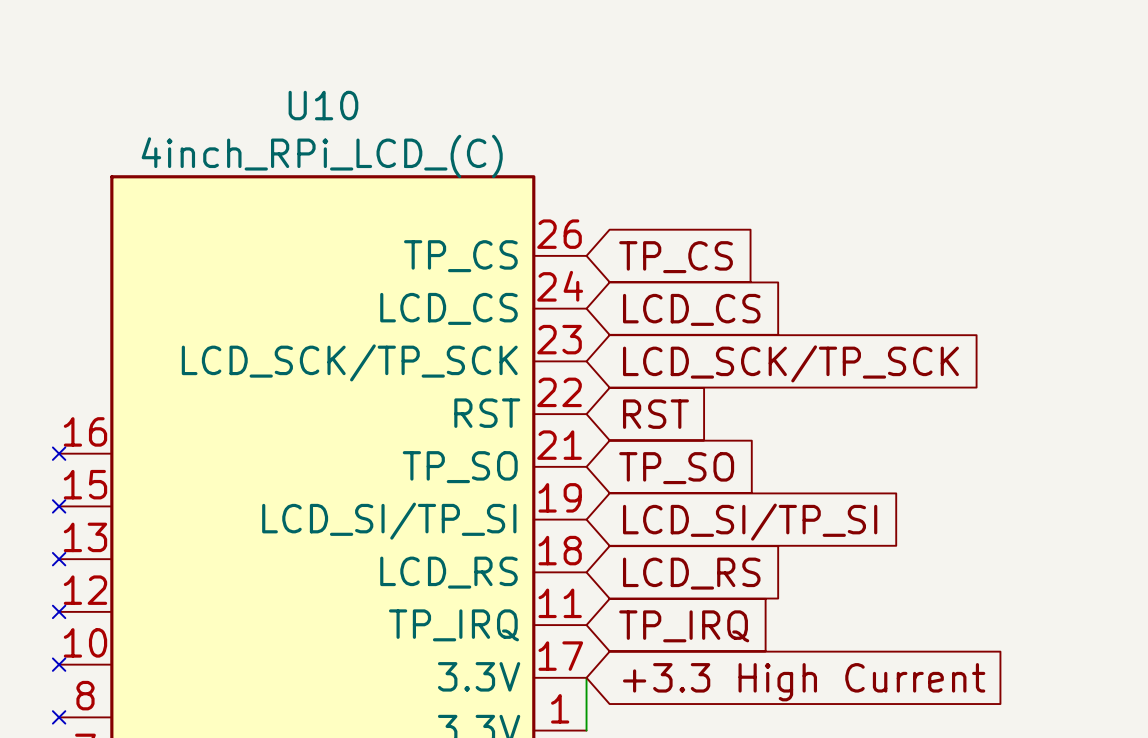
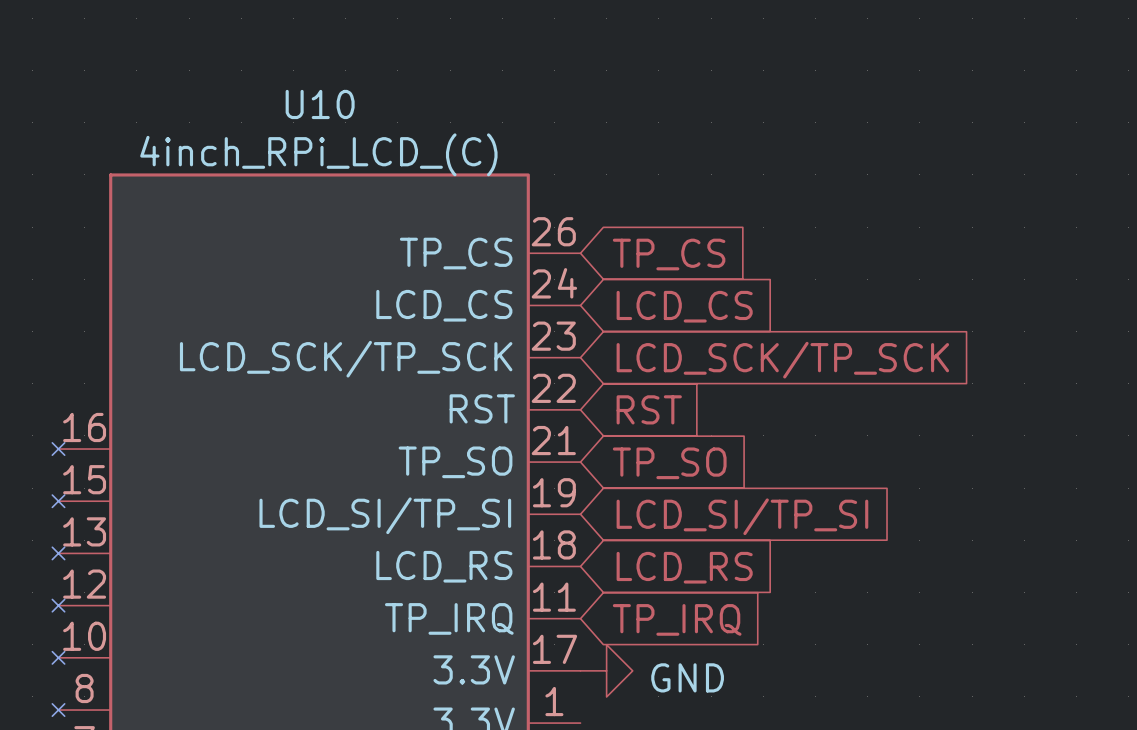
wire: (586, 677) (586, 730) -> none
power symbol: none -> GND (606, 670)
global label: +3.3 High Current (804, 682) -> none

